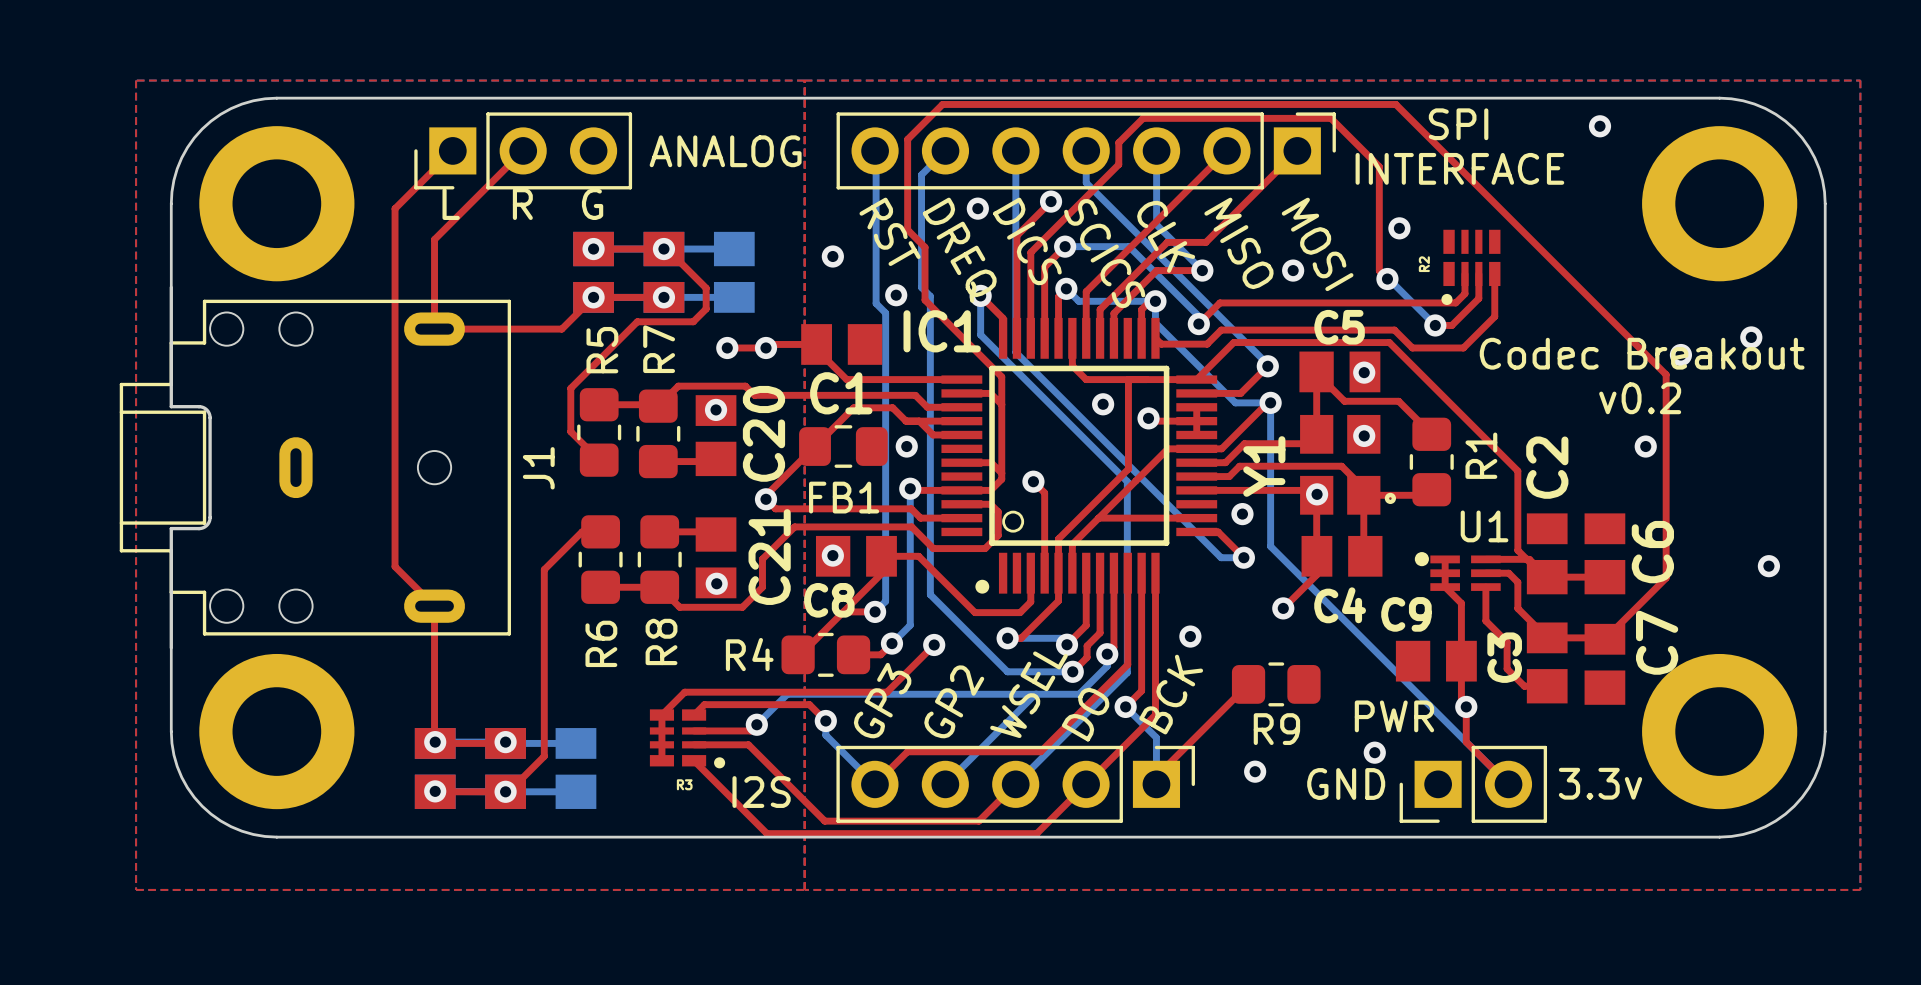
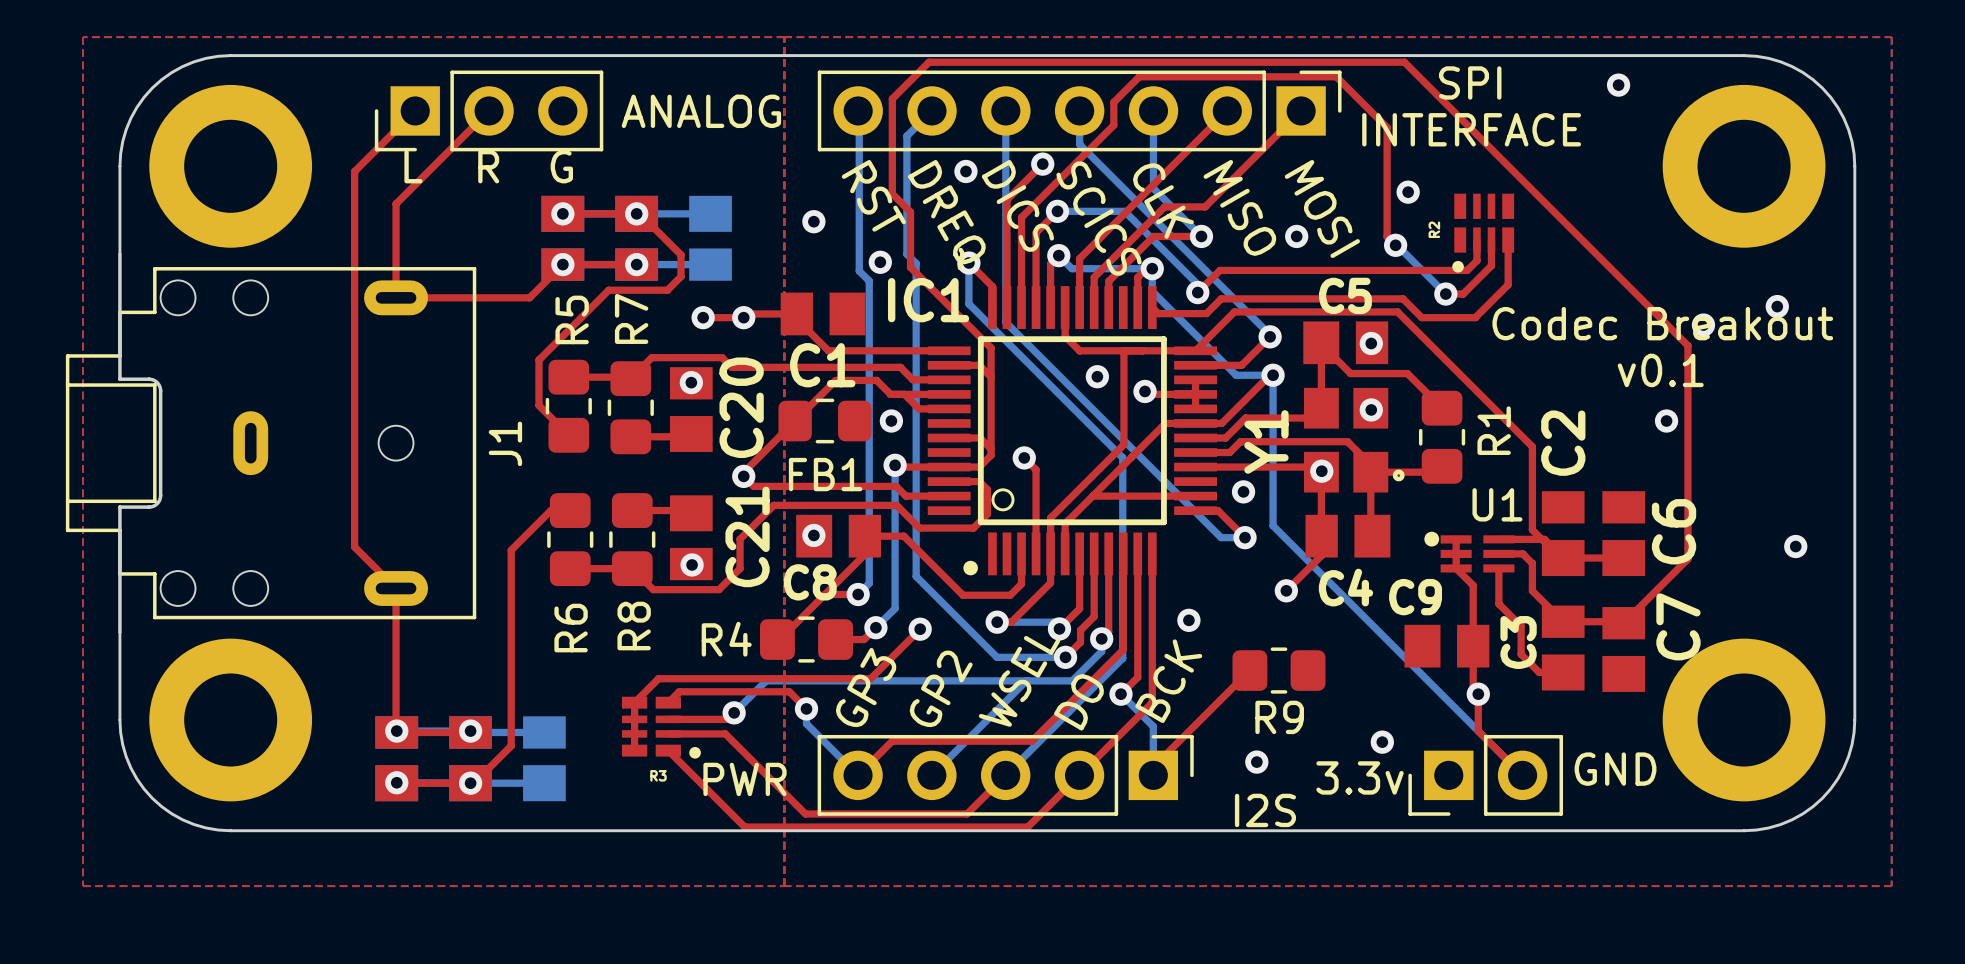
text: v0.2 (1640, 398) -> v0.1 (1660, 370)
text: PWR (1394, 716) -> none
text: 3.3v (1600, 783) -> GND (1615, 769)
text: GND (1346, 784) -> 3.3v (1360, 777)
text: I2S (761, 792) -> PWR (745, 779)
text: none -> I2S (1265, 810)

